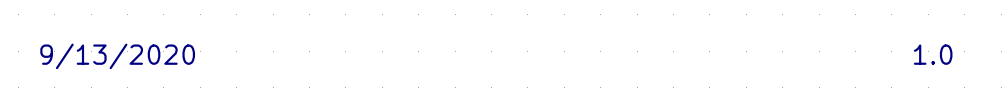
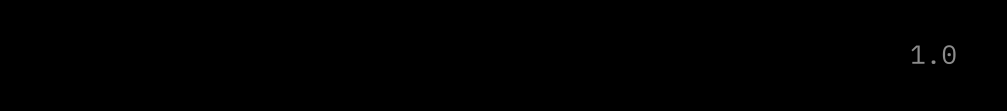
text: 9/13/2020 (117, 56) -> none

